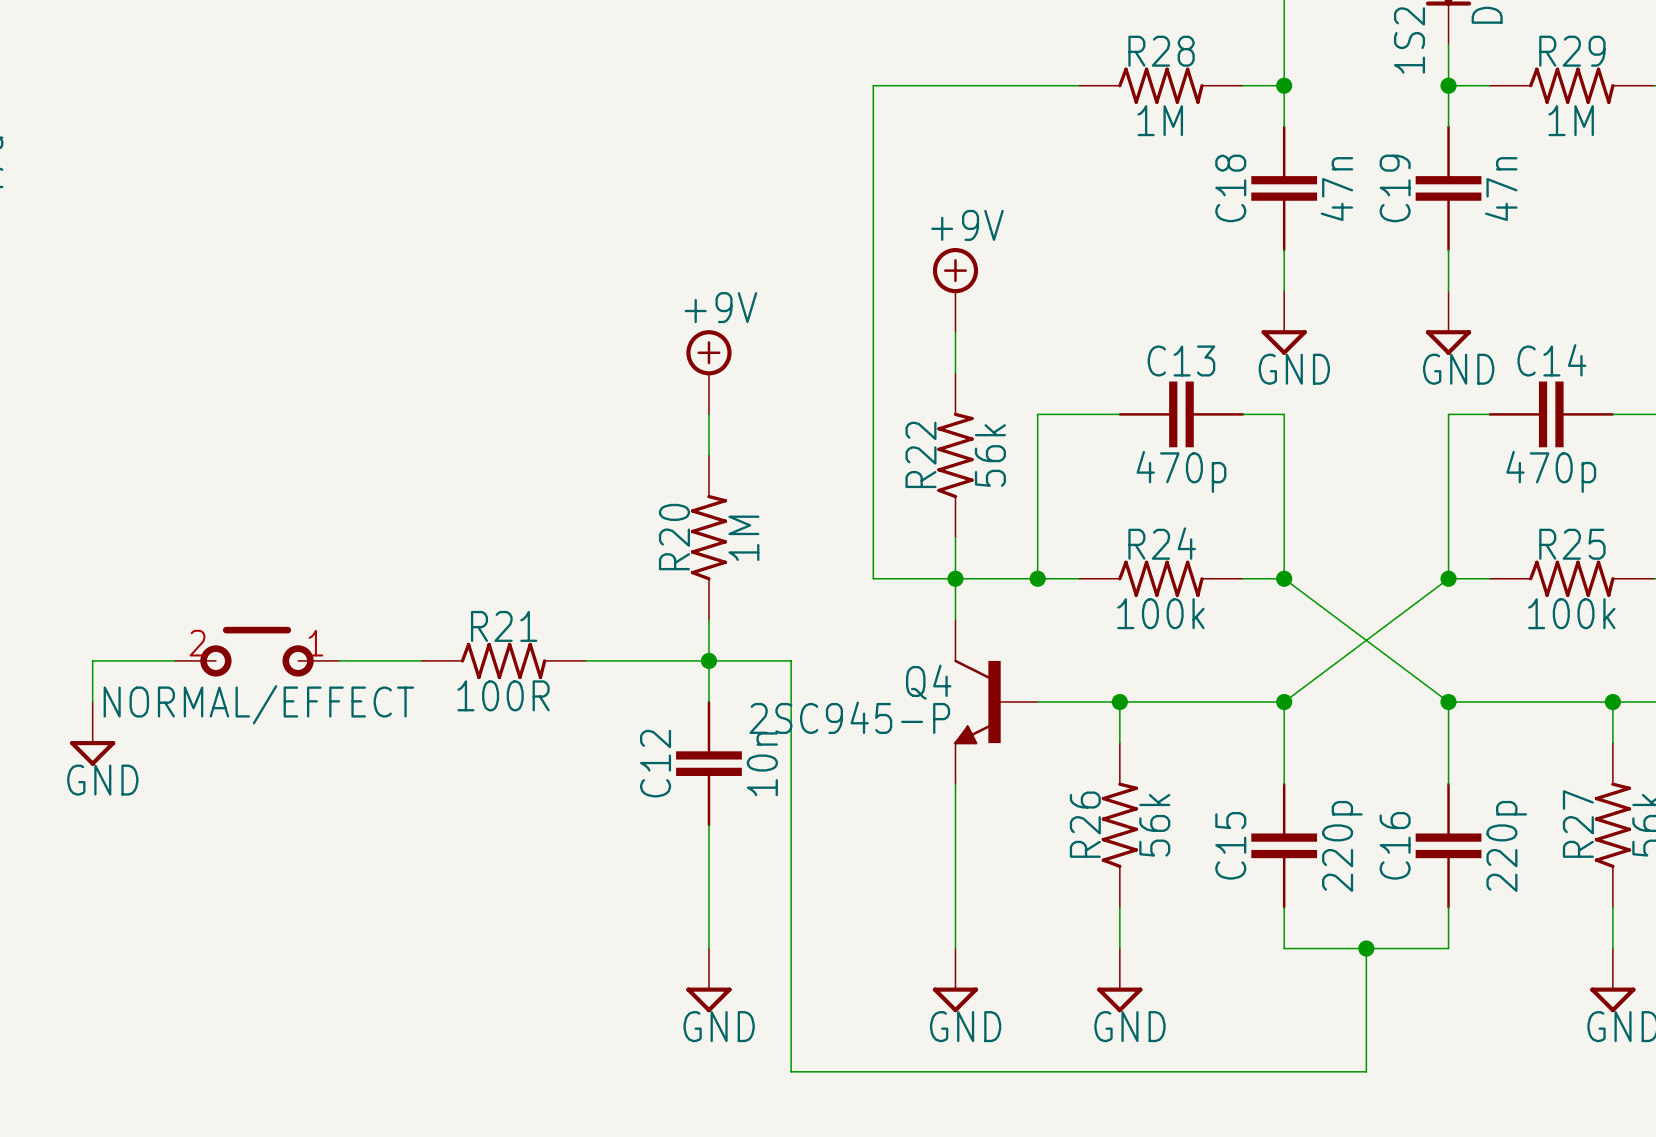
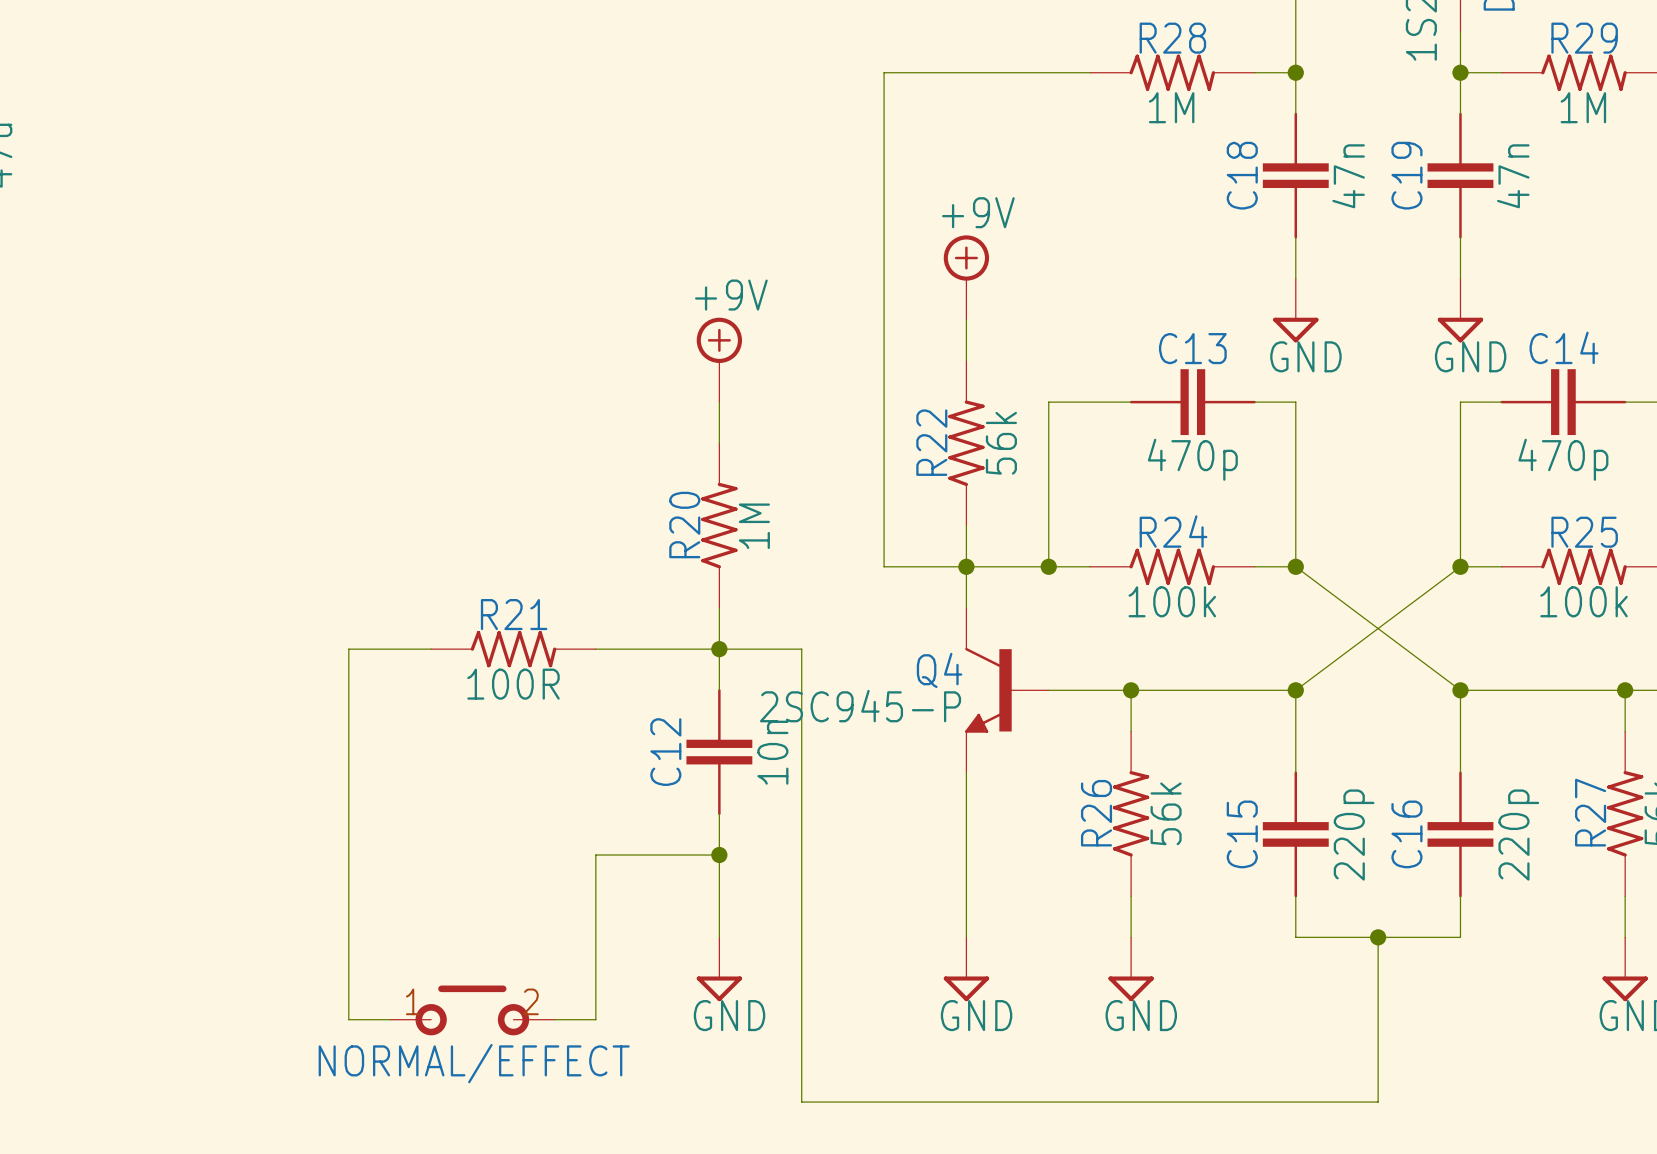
NORMAL/EFFECT: (257, 651) -> none
wire: (174, 660) (92, 660) (92, 702) -> none
wire: none -> (348, 649) (348, 1019) (389, 1019)
power symbol: GND (92, 733) -> none
wire: none -> (719, 855) (595, 855) (595, 1019) (554, 1019)
junction: none -> (719, 855)
NORMAL/EFFECT: none -> (472, 1010)
wire: (791, 1071) (1366, 1071) -> (801, 1060) (801, 1102) (1378, 1102) (1378, 1060)

